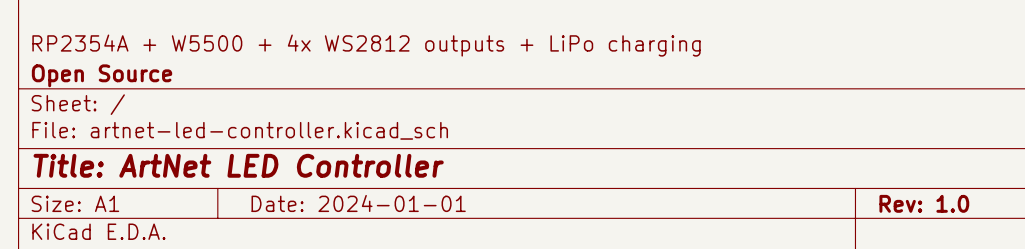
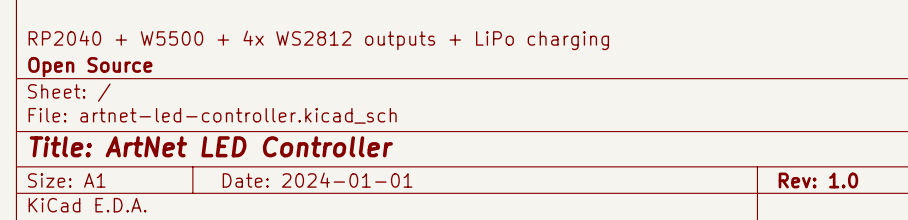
title block: RP2354A + W5500 + 4x WS2812 outputs + LiPo charging (366, 45) -> RP2040 + W5500 + 4x WS2812 outputs + LiPo charging (318, 40)

